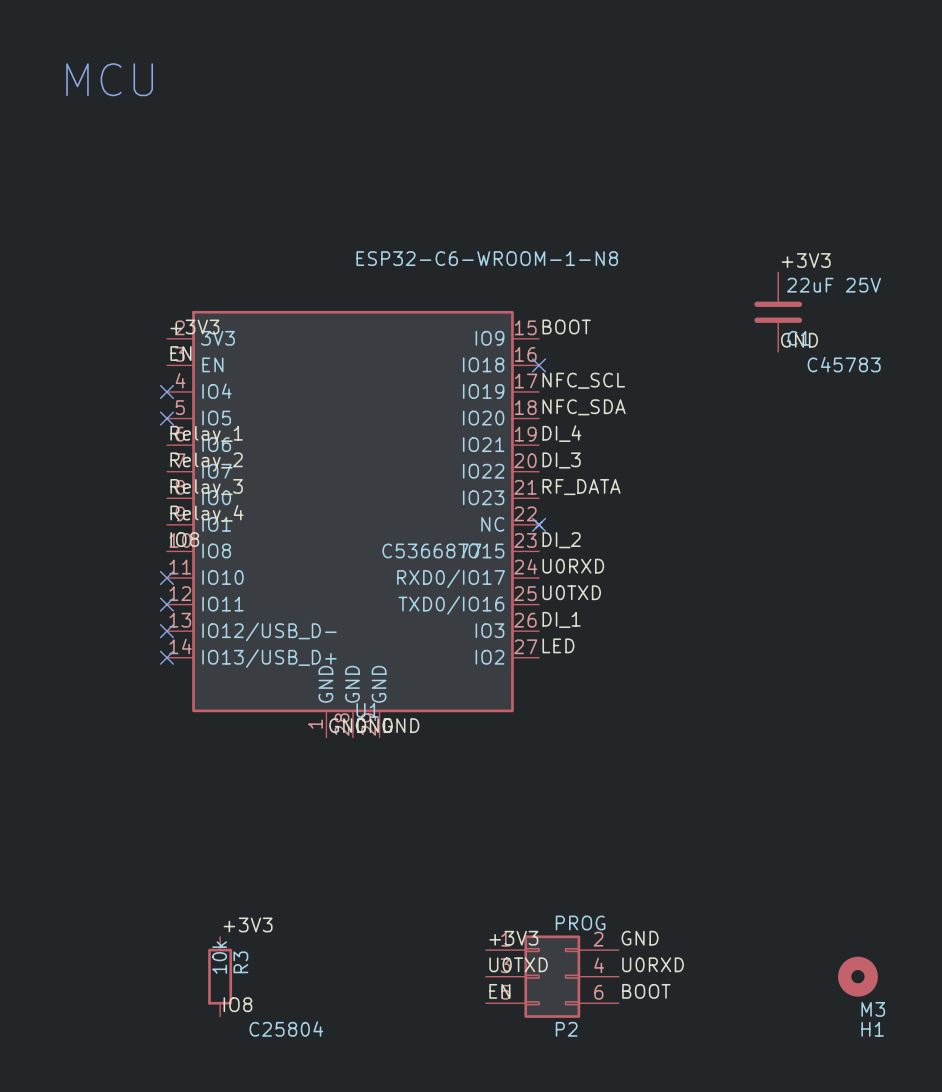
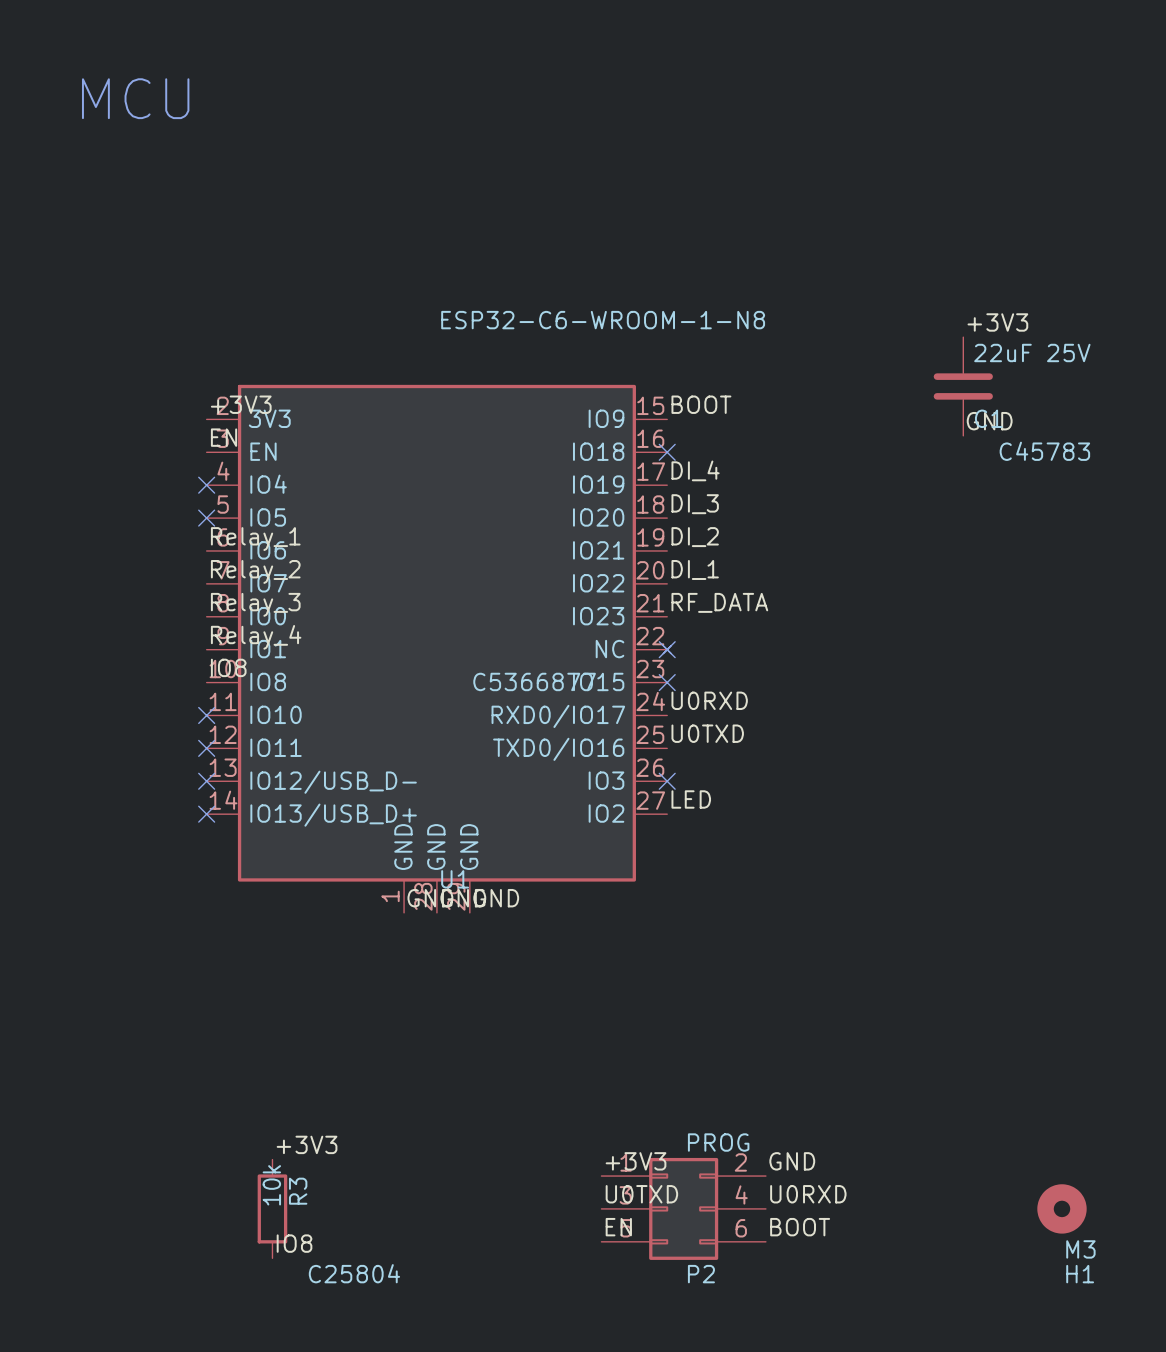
label: NFC_SCL (583, 380) -> DI_4 (695, 470)
label: NFC_SDA (584, 407) -> DI_3 (695, 504)
label: DI_4 (561, 433) -> DI_2 (695, 537)
label: DI_3 (561, 460) -> DI_1 (695, 569)
label: DI_2 (561, 540) -> none
no-connect mark: none -> (667, 682)
label: DI_1 (561, 619) -> none
no-connect mark: none -> (667, 781)

